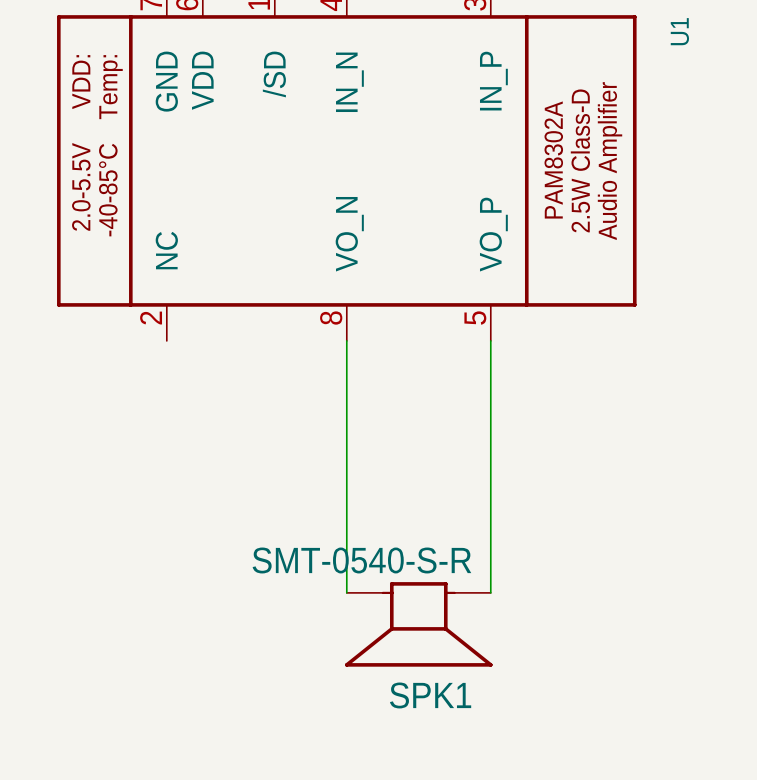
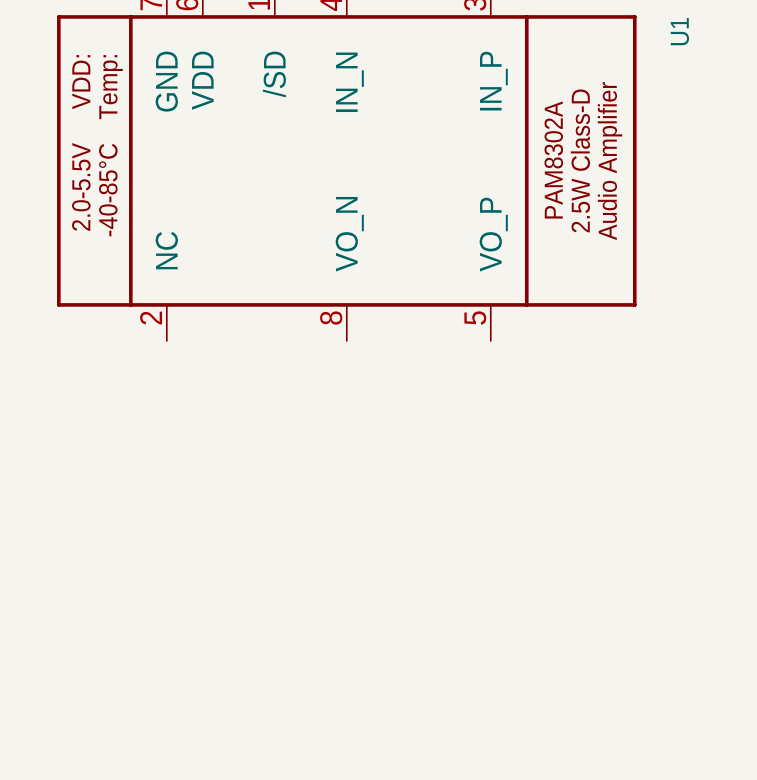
wire: (346, 340) (346, 592) -> none
wire: (490, 340) (490, 592) -> none
SPK1: SMT-0540-S-R (418, 624) -> none

